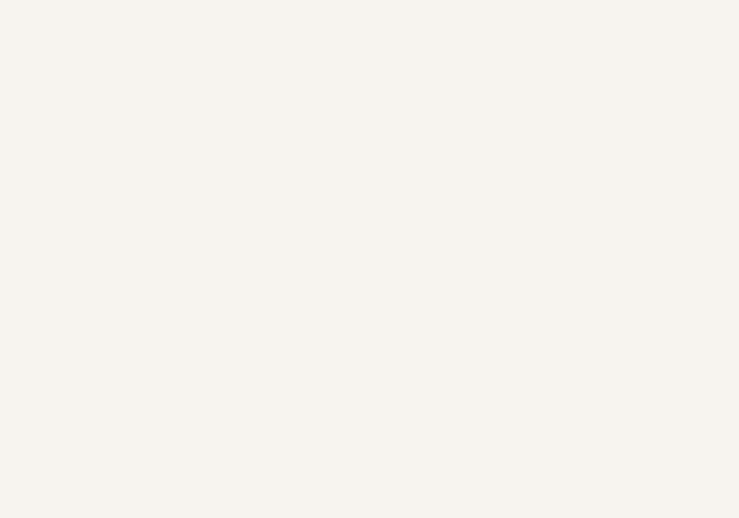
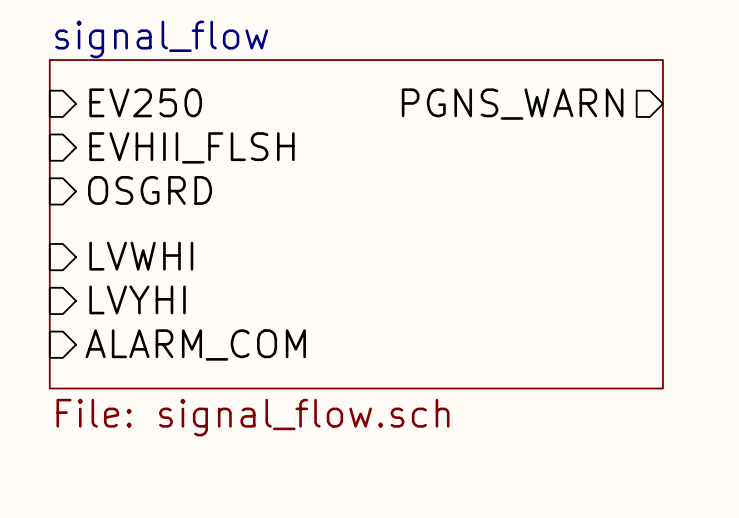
sheet pin: none -> EV250 (145, 102)
sheet pin: none -> PGNS_WARN (512, 104)
sheet pin: none -> EVHII_FLSH (191, 147)
sheet pin: none -> OSGRD (150, 190)
sheet signal_flow: none -> File: signal_flow.sch (356, 224)
sheet pin: none -> LVWHI (141, 256)
sheet pin: none -> LVYHI (137, 299)
sheet pin: none -> ALARM_COM (195, 344)

